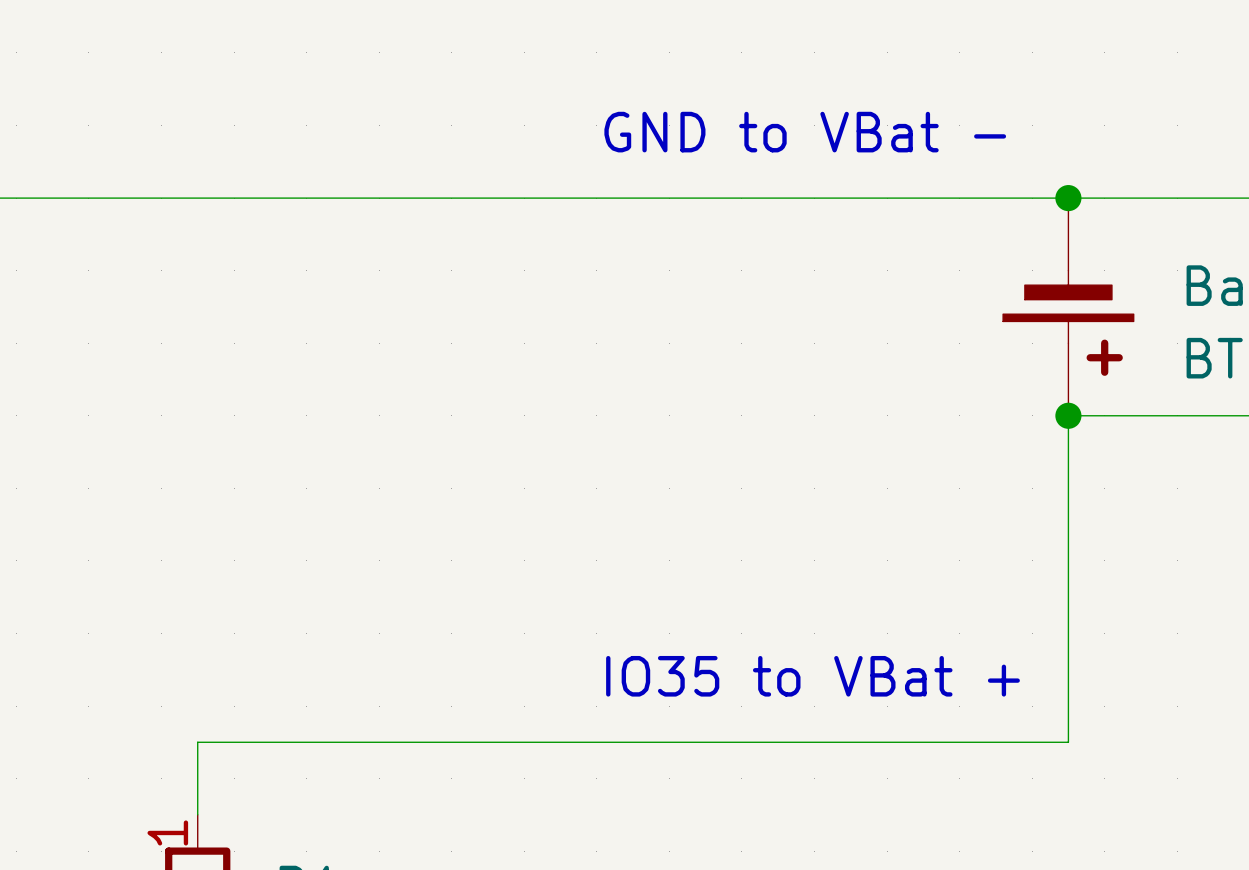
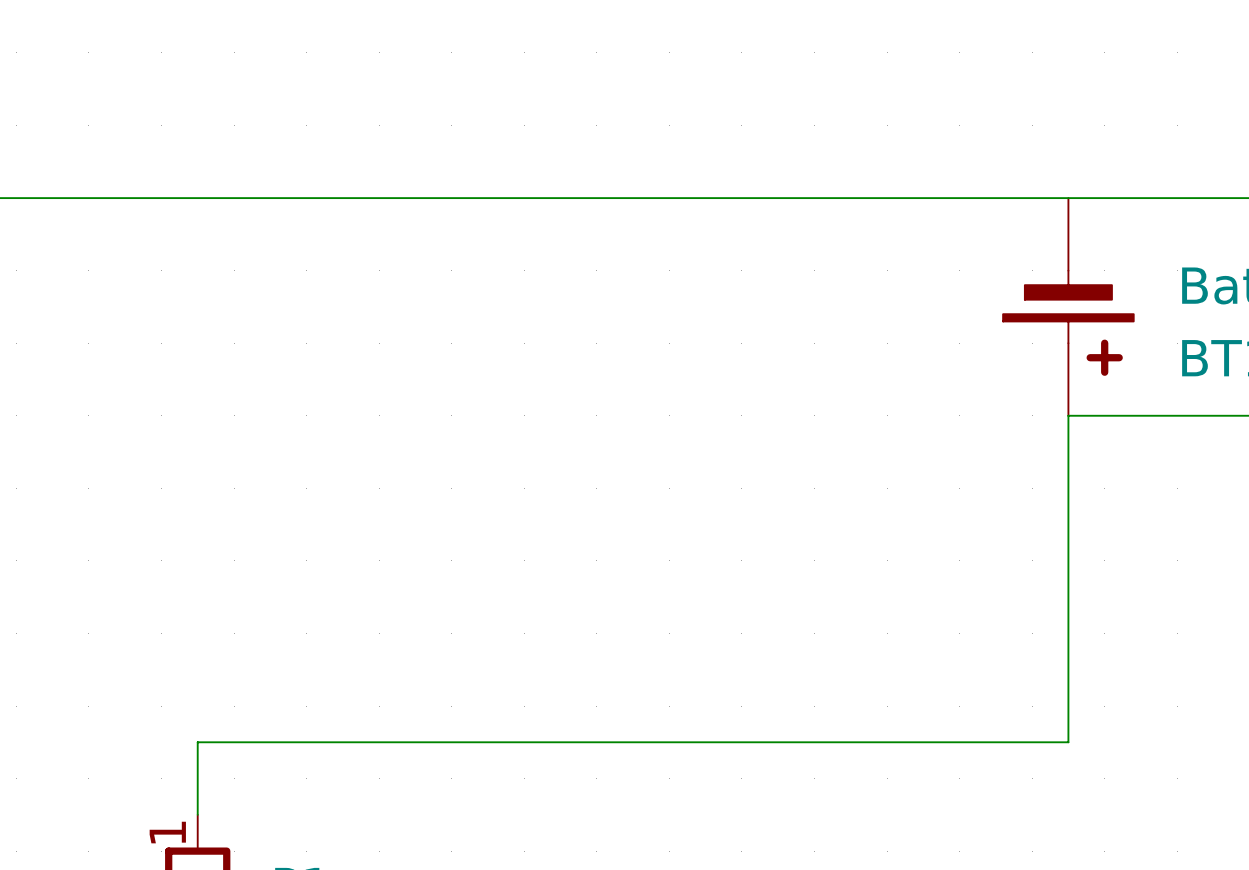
text: GND to VBat - (805, 132) -> none
junction: (1068, 198) -> none
junction: (1068, 415) -> none
text: IO35 to VBat + (813, 676) -> none

